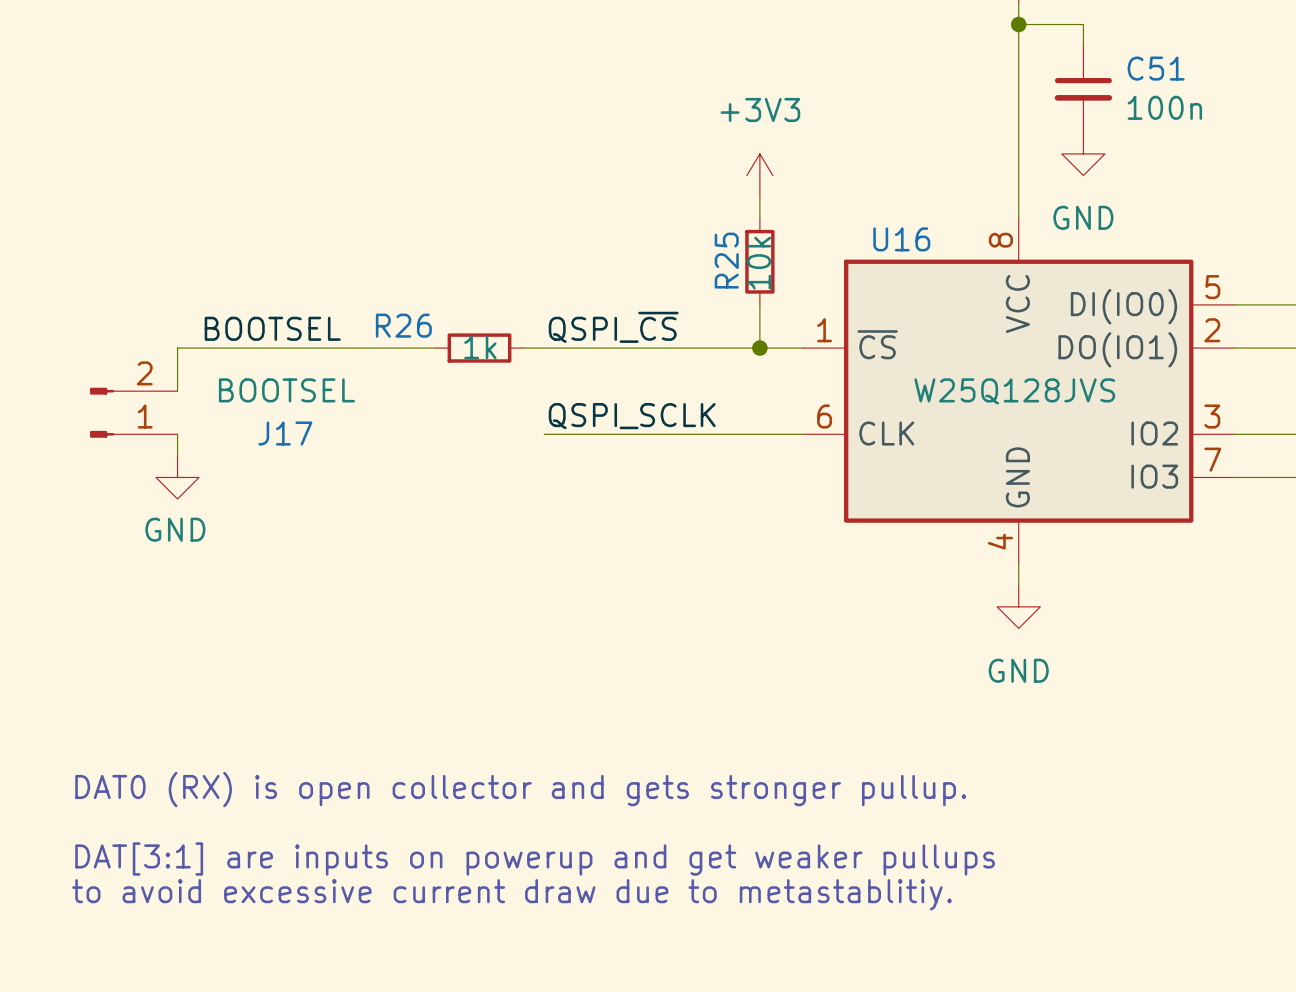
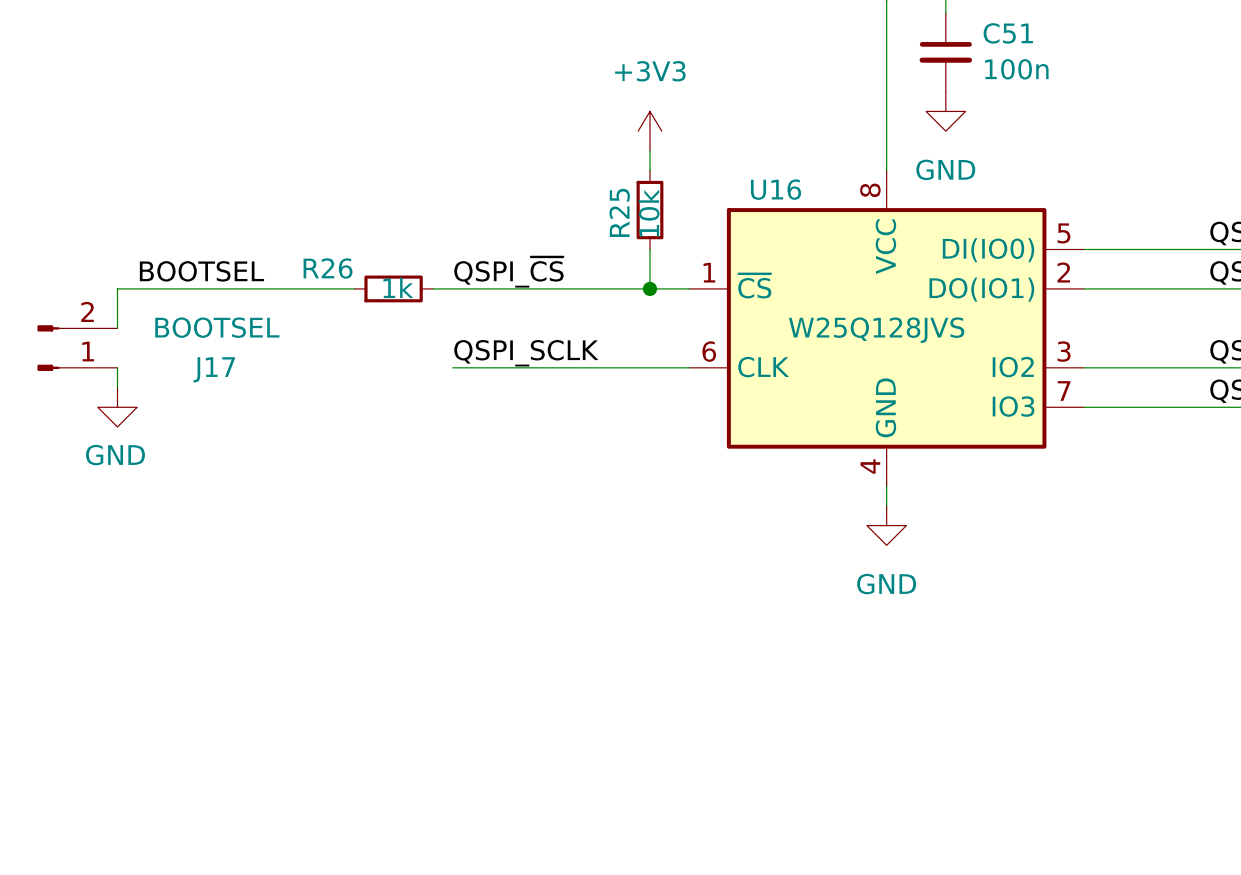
text: DAT0 (RX) is open collector and gets stronger pullup. (520, 789) -> none
text: DAT[3:1] are inputs on powerup and get weaker pullups (535, 858) -> none
text: to avoid excessive current draw due to metastablitiy. (512, 894) -> none

